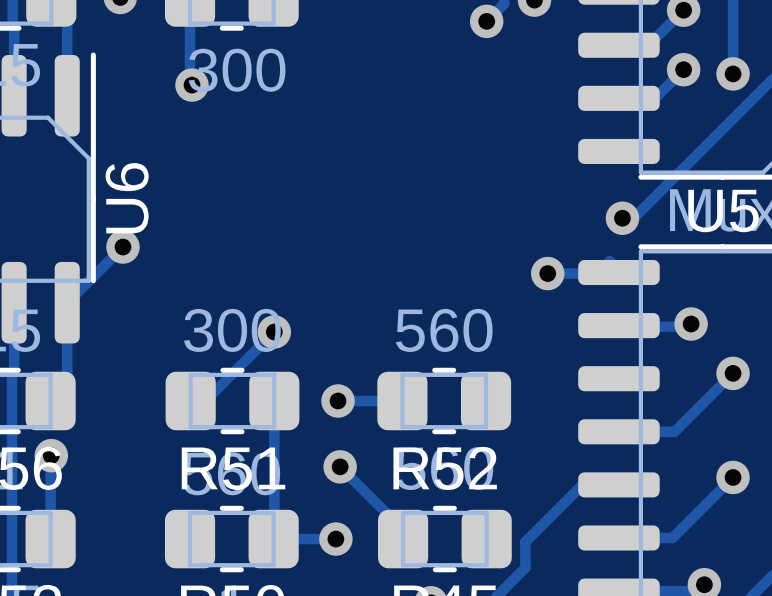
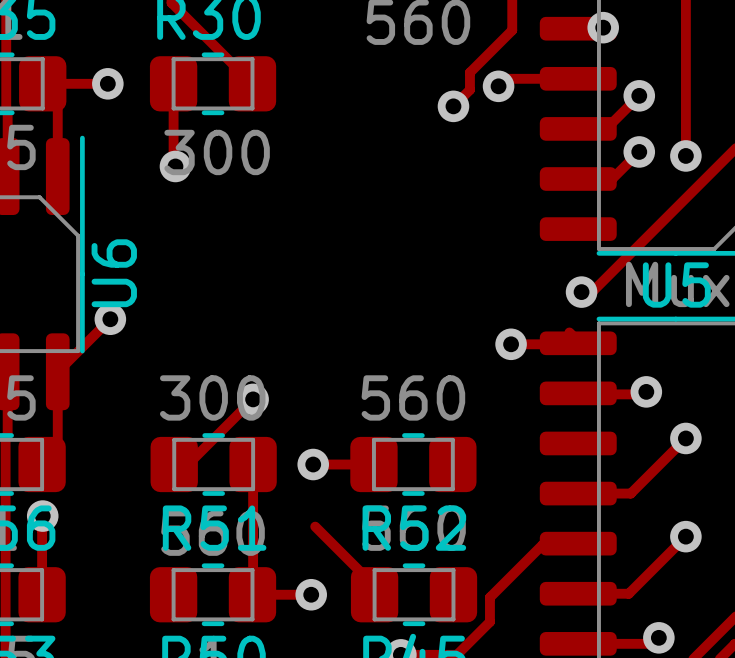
via: (340, 466) -> none

